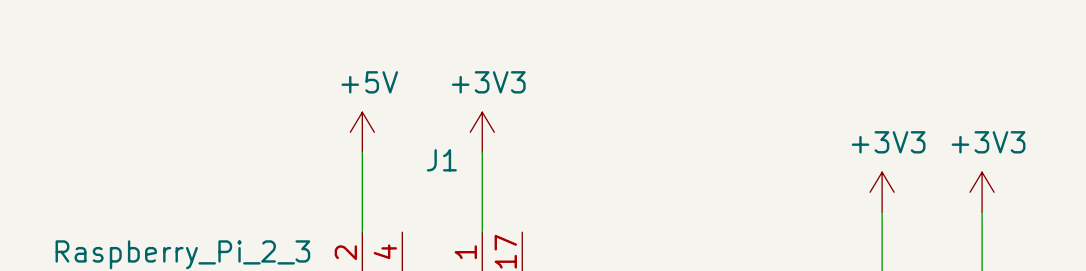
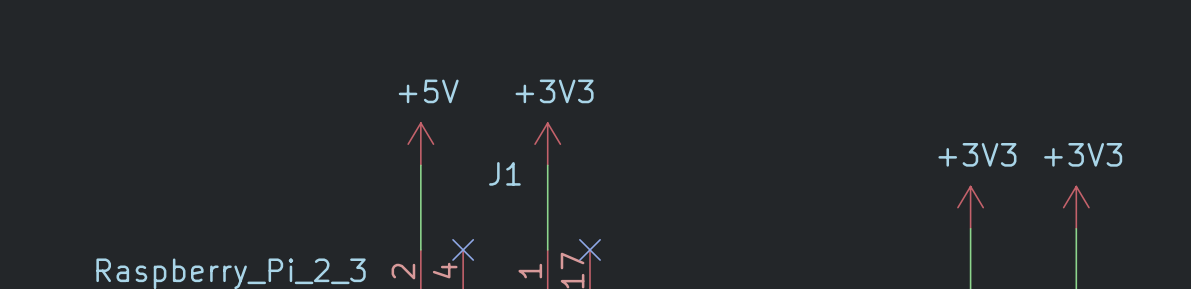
no-connect mark: none -> (463, 249)
no-connect mark: none -> (590, 249)

